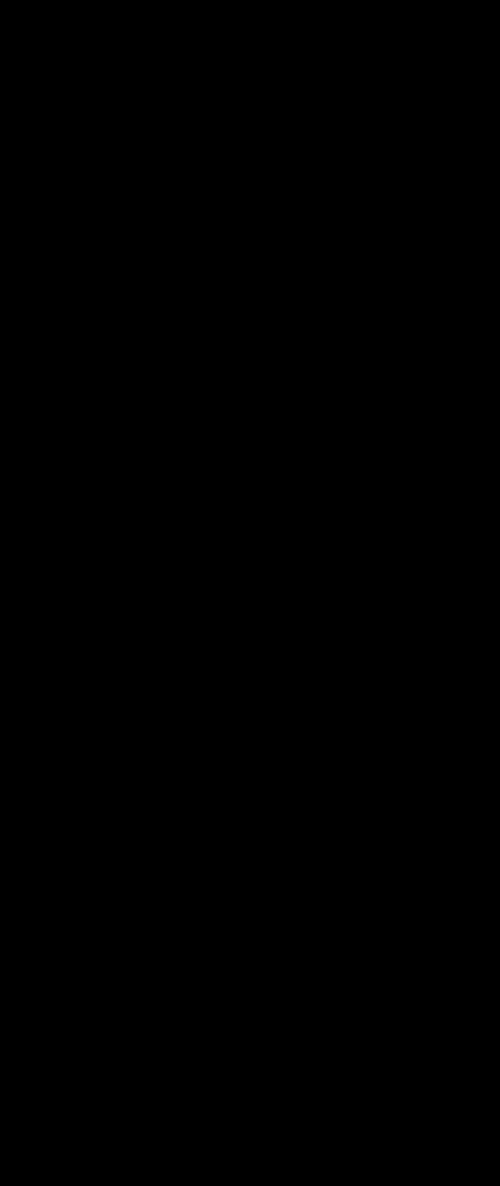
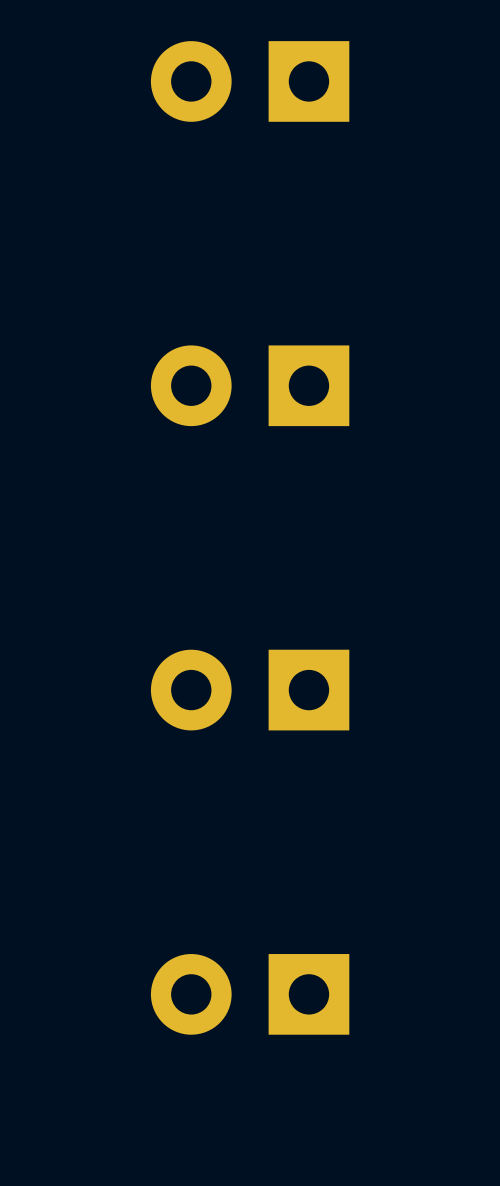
part: none -> (250, 81)
part: none -> (250, 385)
part: none -> (250, 690)
part: none -> (250, 994)

